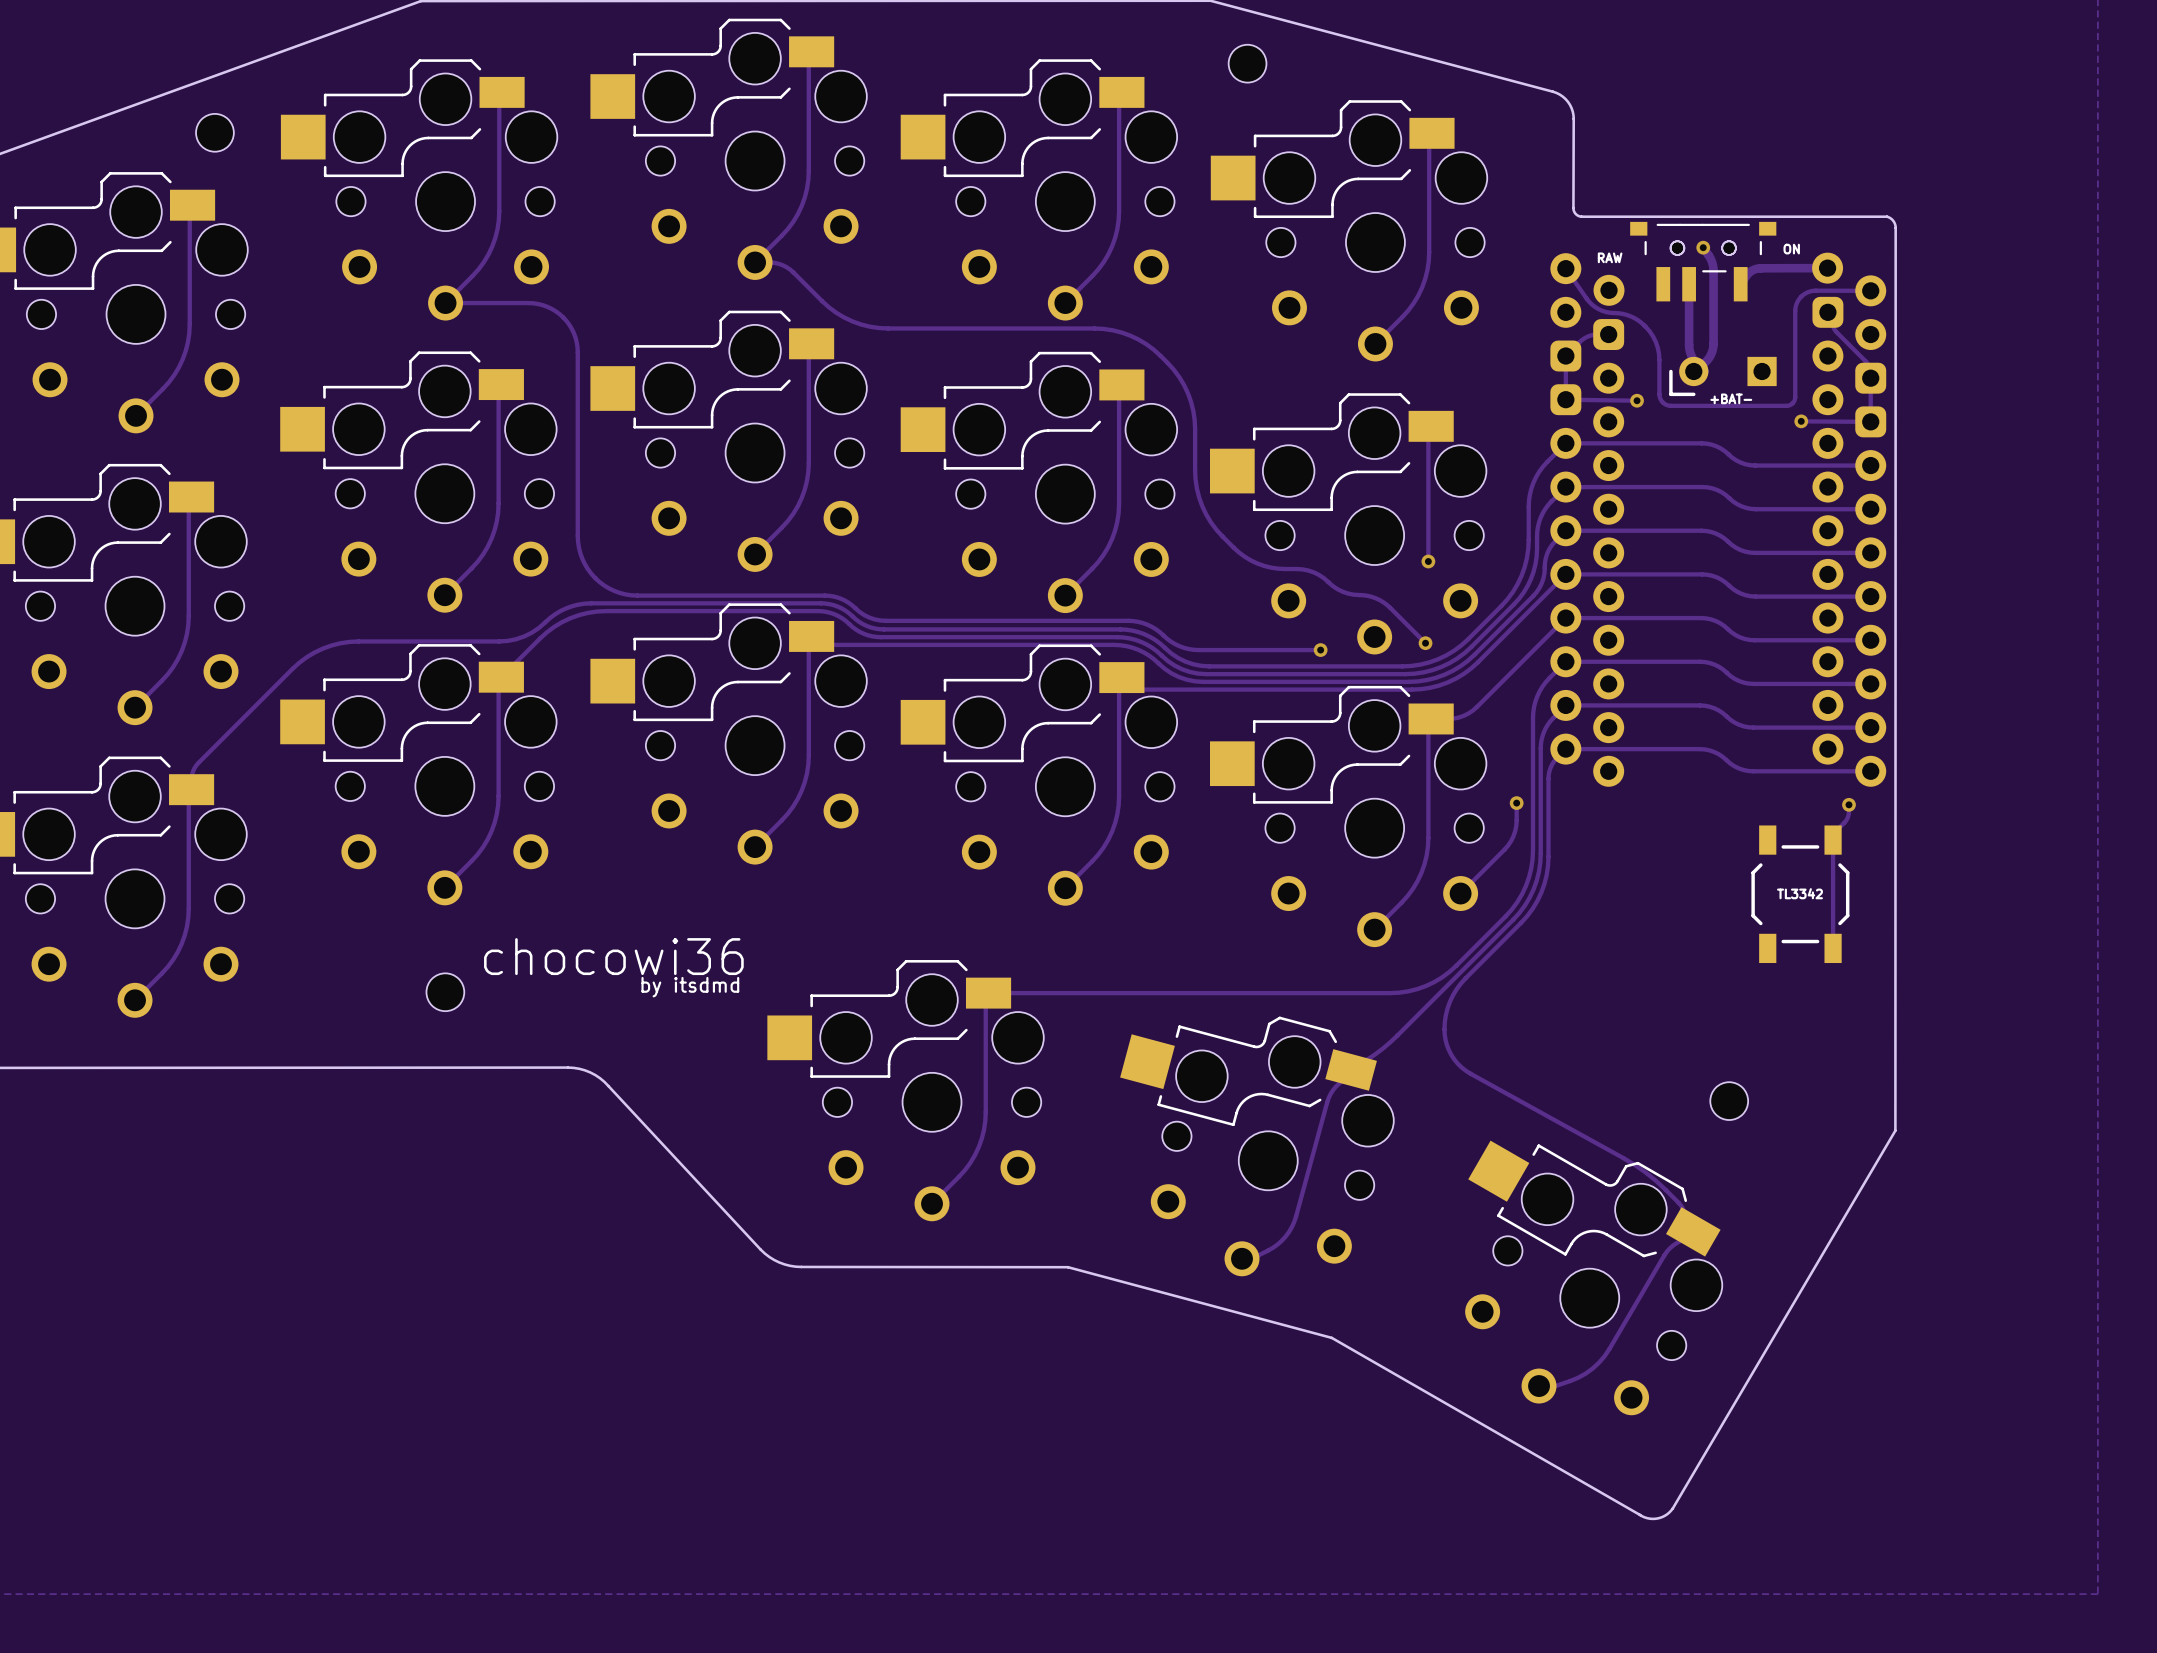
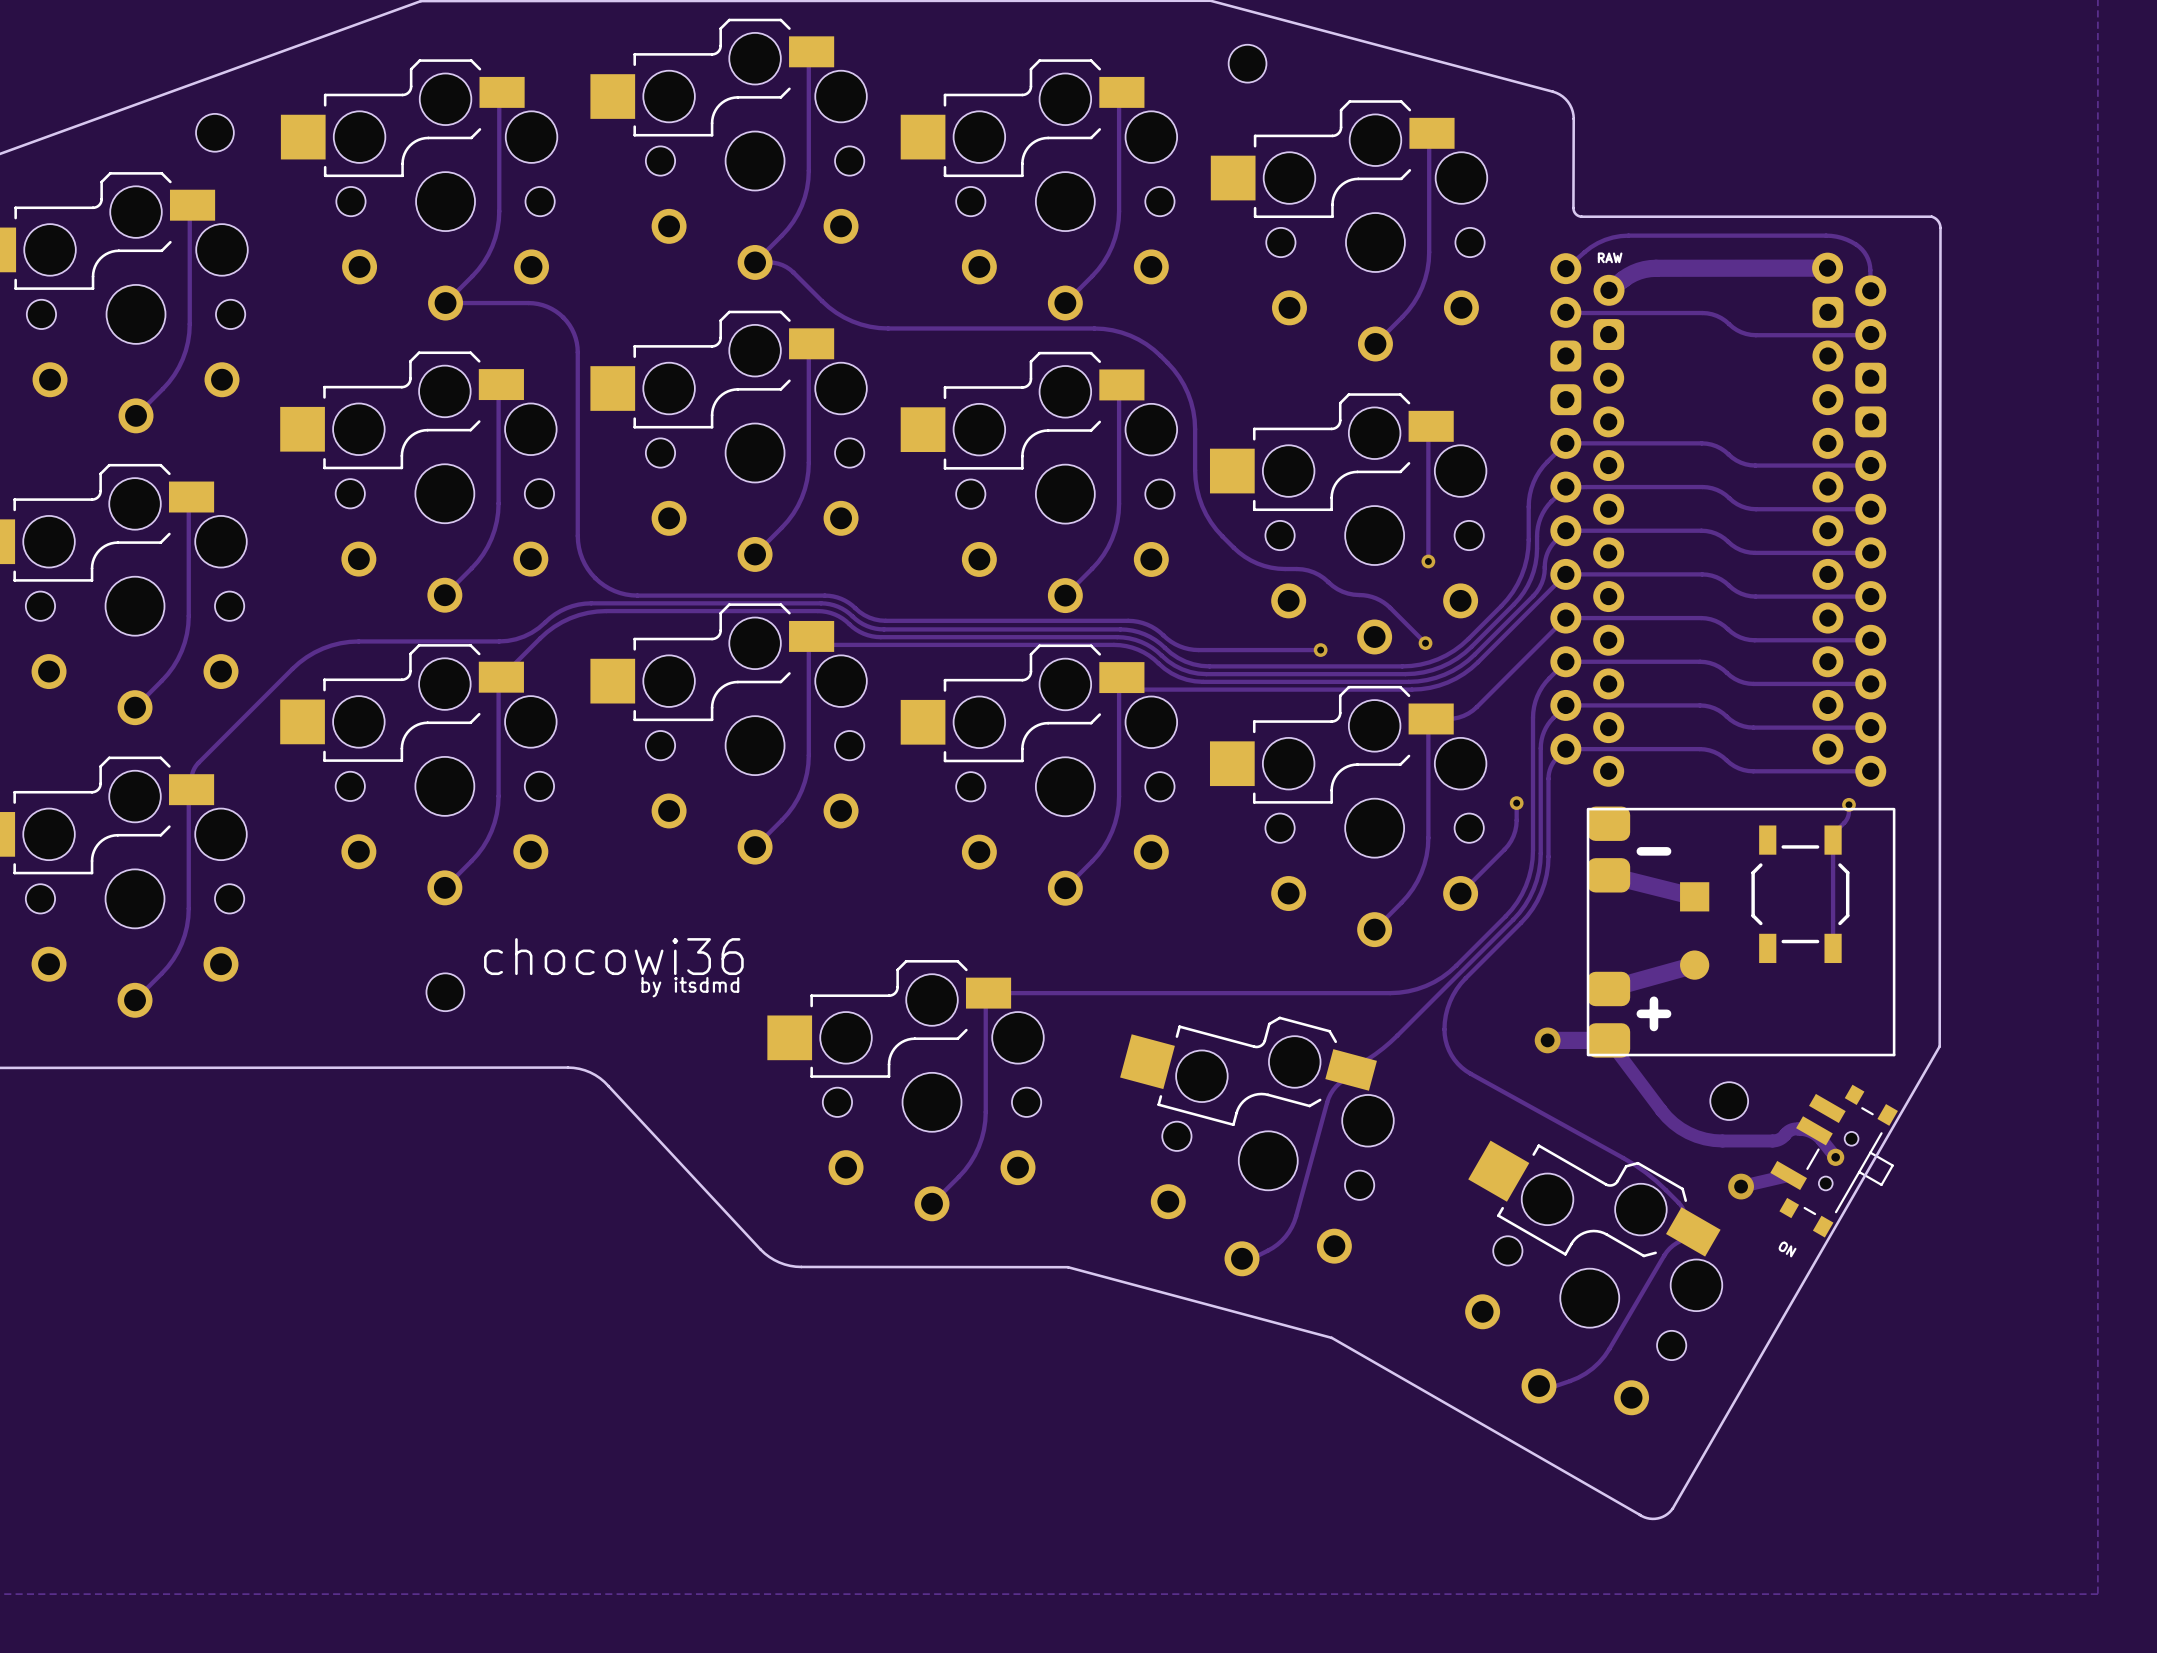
board edge: (1887, 216) (1893, 220) (1895, 227) (1895, 1130) (1672, 1508) -> (1887, 216) (1931, 216) (1937, 220) (1940, 227) (1939, 1046) (1672, 1508)
track: (1703, 247) (1711, 260) (1713, 268) (1713, 346) (1707, 359) (1693, 371) -> none
via: (1703, 247) -> none
part: (1703, 248) -> none
text: ON (1791, 249) -> none
part: (1703, 261) -> none
track: (1565, 268) (1586, 298) (1595, 307) (1606, 312) (1630, 316) (1641, 322) (1649, 331) (1655, 342) (1659, 353) (1659, 397) (1662, 402) (1669, 405) (1790, 404) (1795, 398) (1795, 311) (1798, 299) (1806, 293) (1813, 290) (1870, 290) -> (1565, 268) (1597, 243) (1620, 236) (1831, 235) (1851, 241) (1864, 252) (1870, 266) (1870, 290)
track: (1827, 268) (1758, 268) (1748, 272) (1740, 284) -> (1827, 268) (1650, 268) (1633, 273) (1609, 290)
track: (1689, 284) (1689, 348) (1692, 358) (1704, 371) -> none
track: none -> (1566, 313) (1707, 313) (1716, 315) (1736, 330) (1750, 334) (1871, 335)
track: (1832, 313) (1834, 330) (1869, 366) (1870, 421) (1801, 421) -> none
track: (1608, 334) (1595, 334) (1585, 337) (1570, 352) (1566, 366) (1565, 399) (1637, 400) -> none
part: (1722, 376) -> none
text: +BAT- (1731, 398) -> none
via: (1637, 400) -> none
via: (1801, 421) -> none
track: none -> (1608, 875) (1694, 896)
part text: TL3342 (1799, 893) -> none
part: none -> (1694, 930)
part: none -> (1741, 932)
track: none -> (1694, 965) (1608, 988)
track: none -> (1547, 1040) (1608, 1040) (1667, 1117) (1680, 1128) (1696, 1136) (1722, 1141) (1774, 1140) (1781, 1138) (1790, 1130) (1802, 1129) (1818, 1136) (1835, 1157)
via: none -> (1547, 1040)
via: none -> (1835, 1157)
part: none -> (1834, 1161)
track: none -> (1788, 1175) (1741, 1186)
via: none -> (1741, 1186)
text: none -> ON (1787, 1249)

